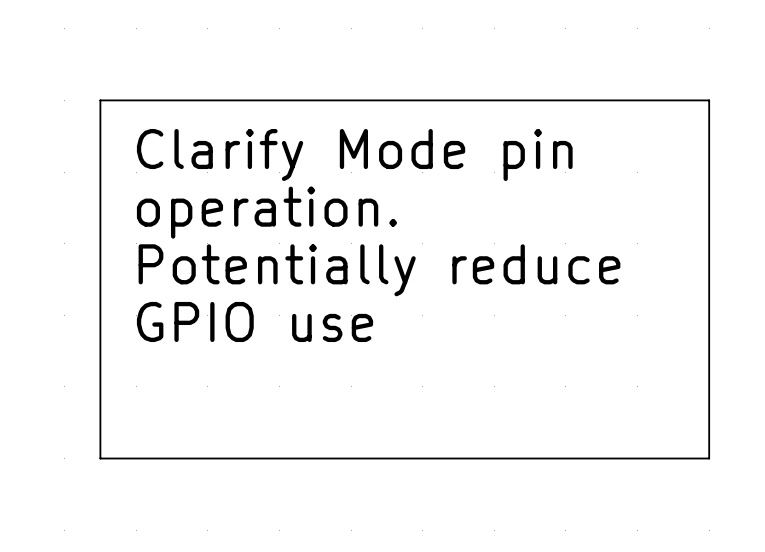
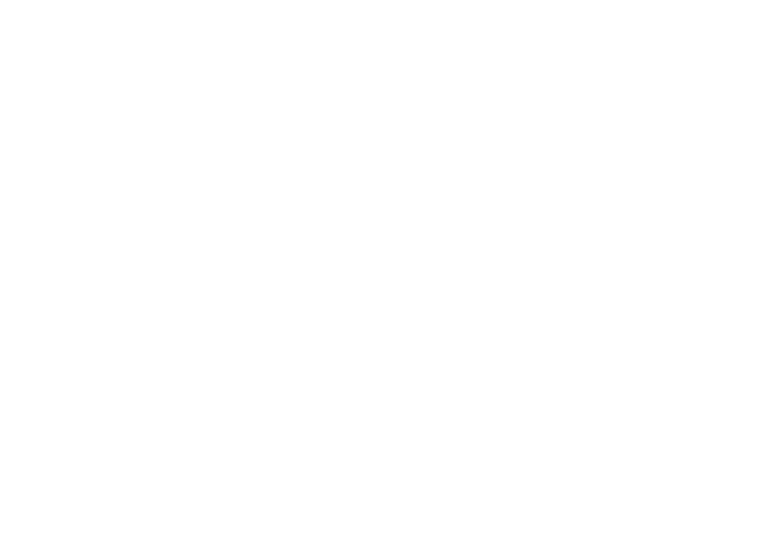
line: (100, 100) (709, 100) (709, 458) (100, 458) (100, 100) -> none
text: Clarify Mode pin (354, 154) -> none
text: operation. (266, 212) -> none
text: Potentially reduce (379, 270) -> none
text: GPIO use (255, 321) -> none

